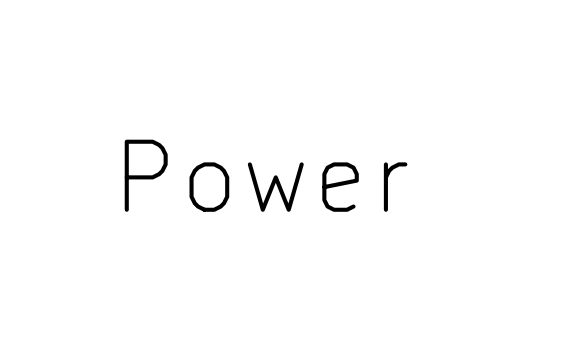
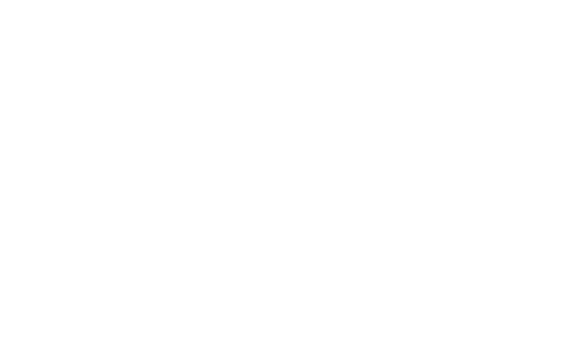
text: Power (266, 175) -> none

